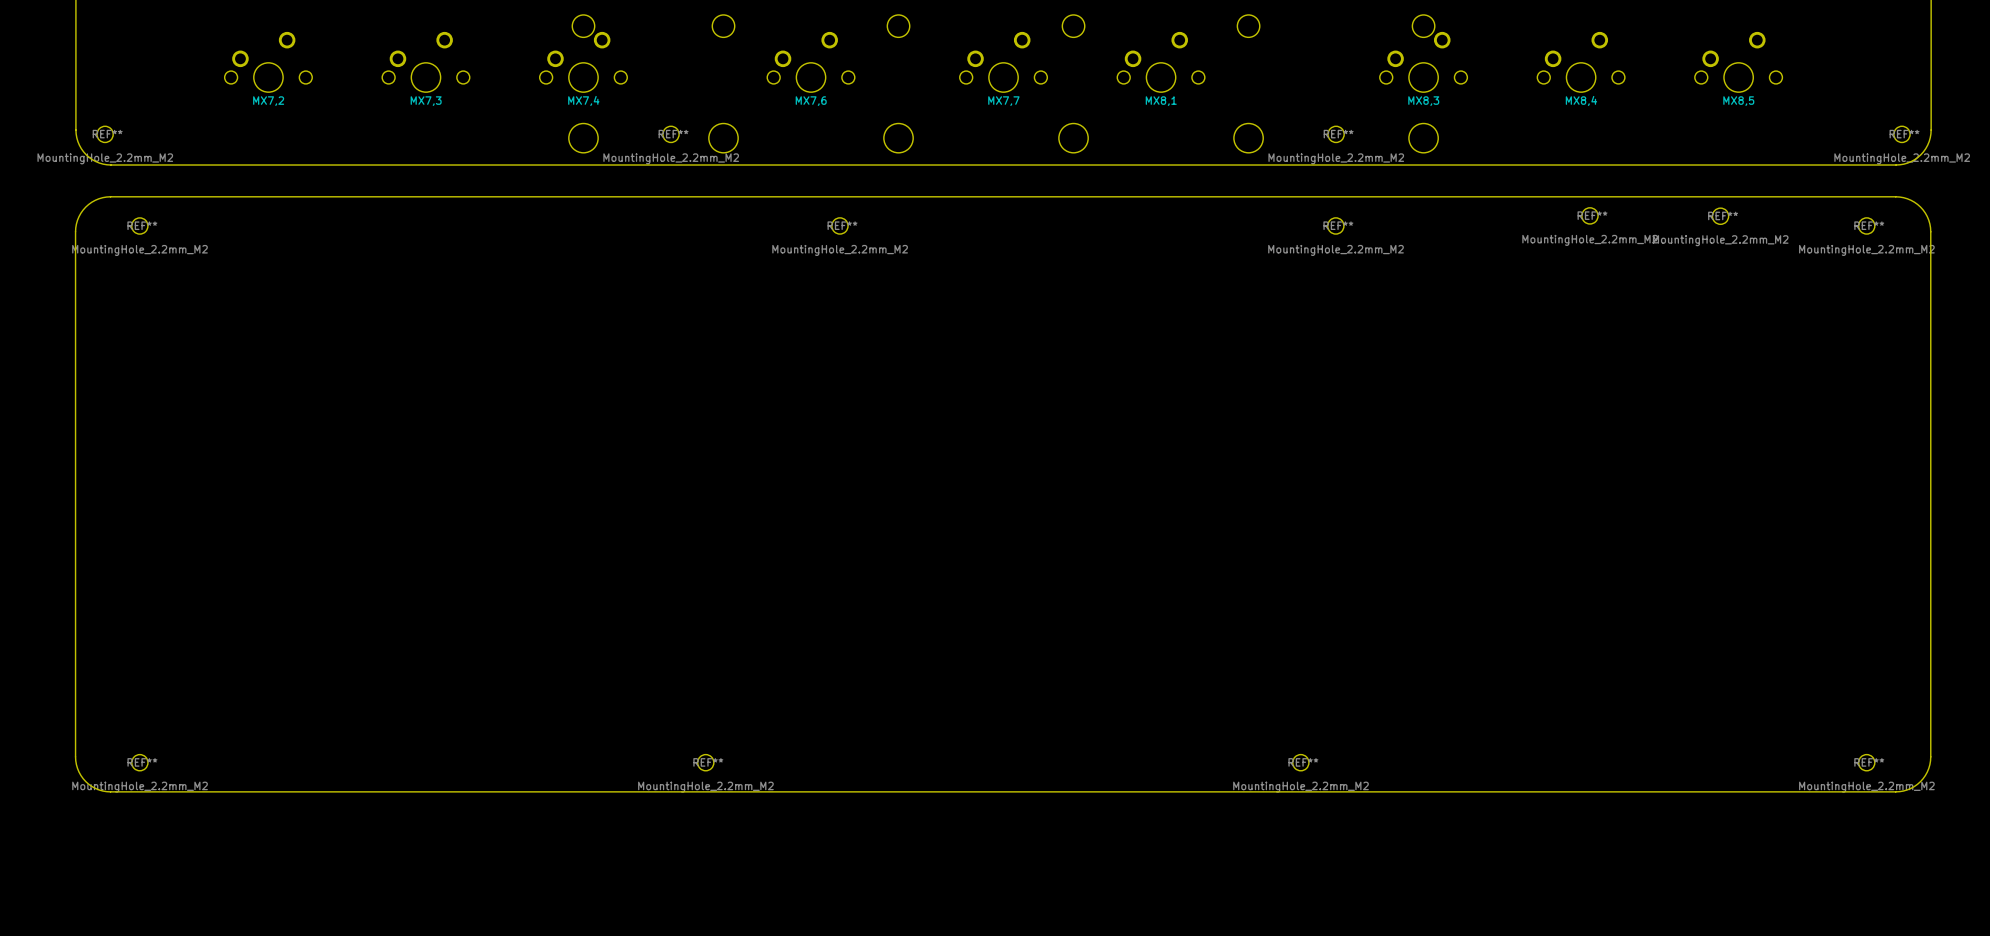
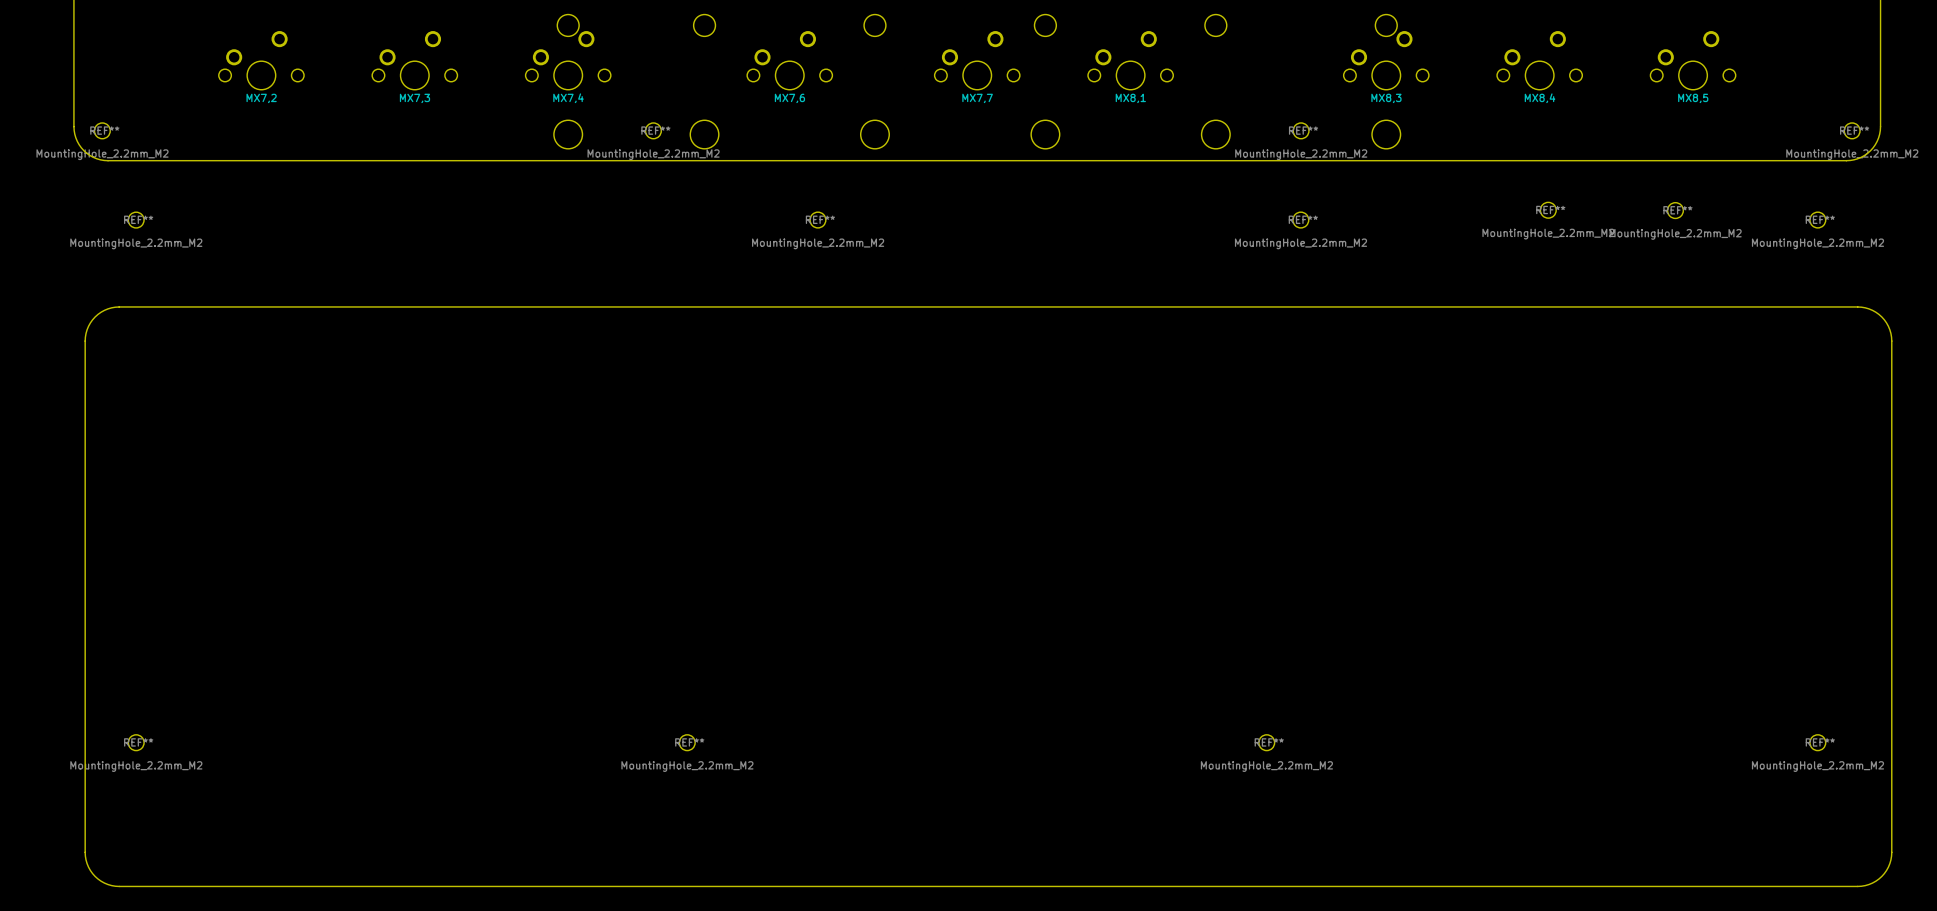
board edge: (110, 196) (1895, 196) (1907, 198) (1923, 209) (1928, 220) (1930, 231) (1930, 756) (1928, 768) (1917, 784) (1907, 789) (1895, 791) (110, 791) (98, 789) (83, 778) (77, 768) (75, 756) (75, 231) (79, 216) (85, 207) (98, 198) (110, 196) -> (119, 306) (1857, 306) (1868, 308) (1884, 319) (1889, 329) (1891, 341) (1891, 852) (1889, 863) (1884, 873) (1875, 881) (1857, 886) (119, 886) (108, 884) (92, 873) (87, 863) (85, 852) (85, 341) (88, 326) (95, 316) (104, 310) (119, 306)

